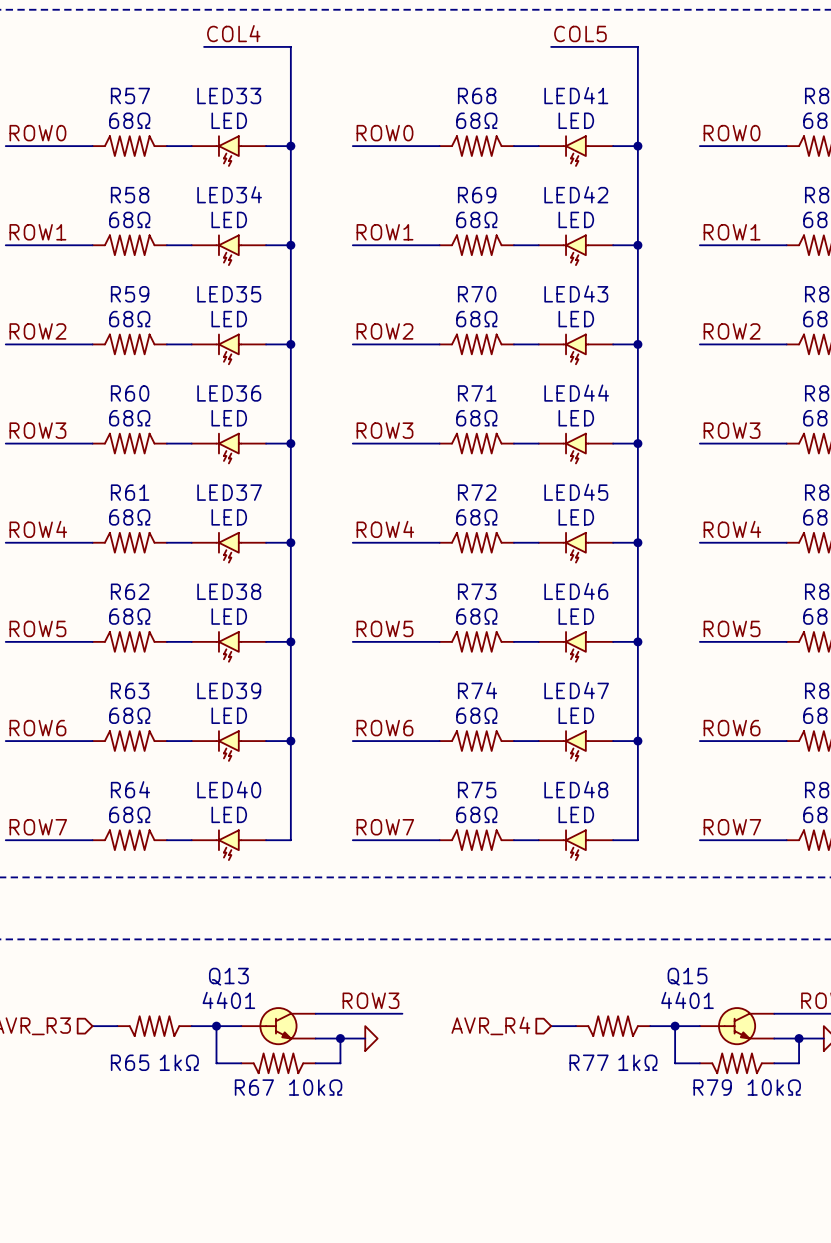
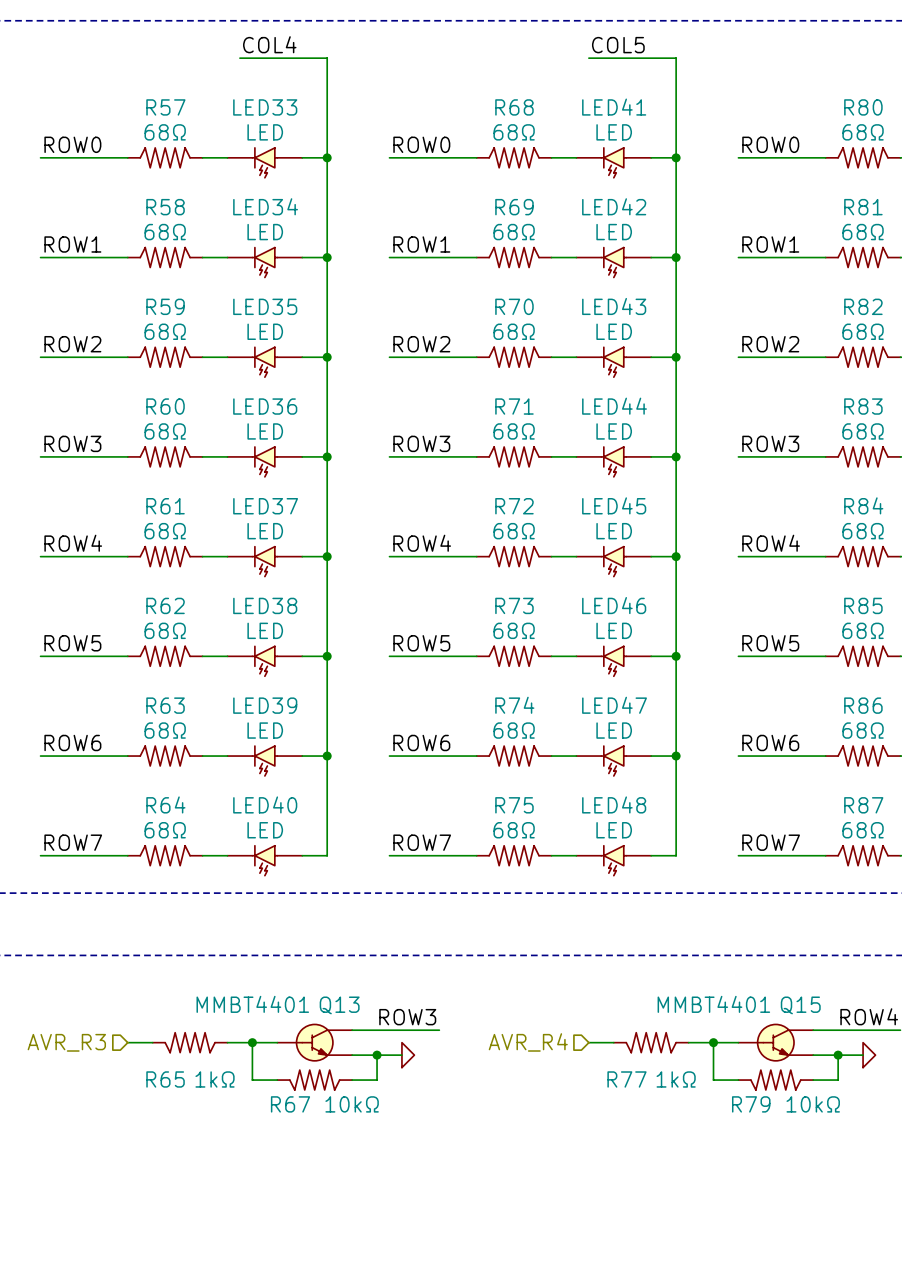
Q13 name position: Q13 (228, 976) -> Q13 (339, 1005)
Q15 name position: Q15 (687, 976) -> Q15 (800, 1005)
Q13 value: 4401 (228, 1000) -> MMBT4401 (252, 1004)
Q15 value: 4401 (687, 1000) -> MMBT4401 (713, 1004)

